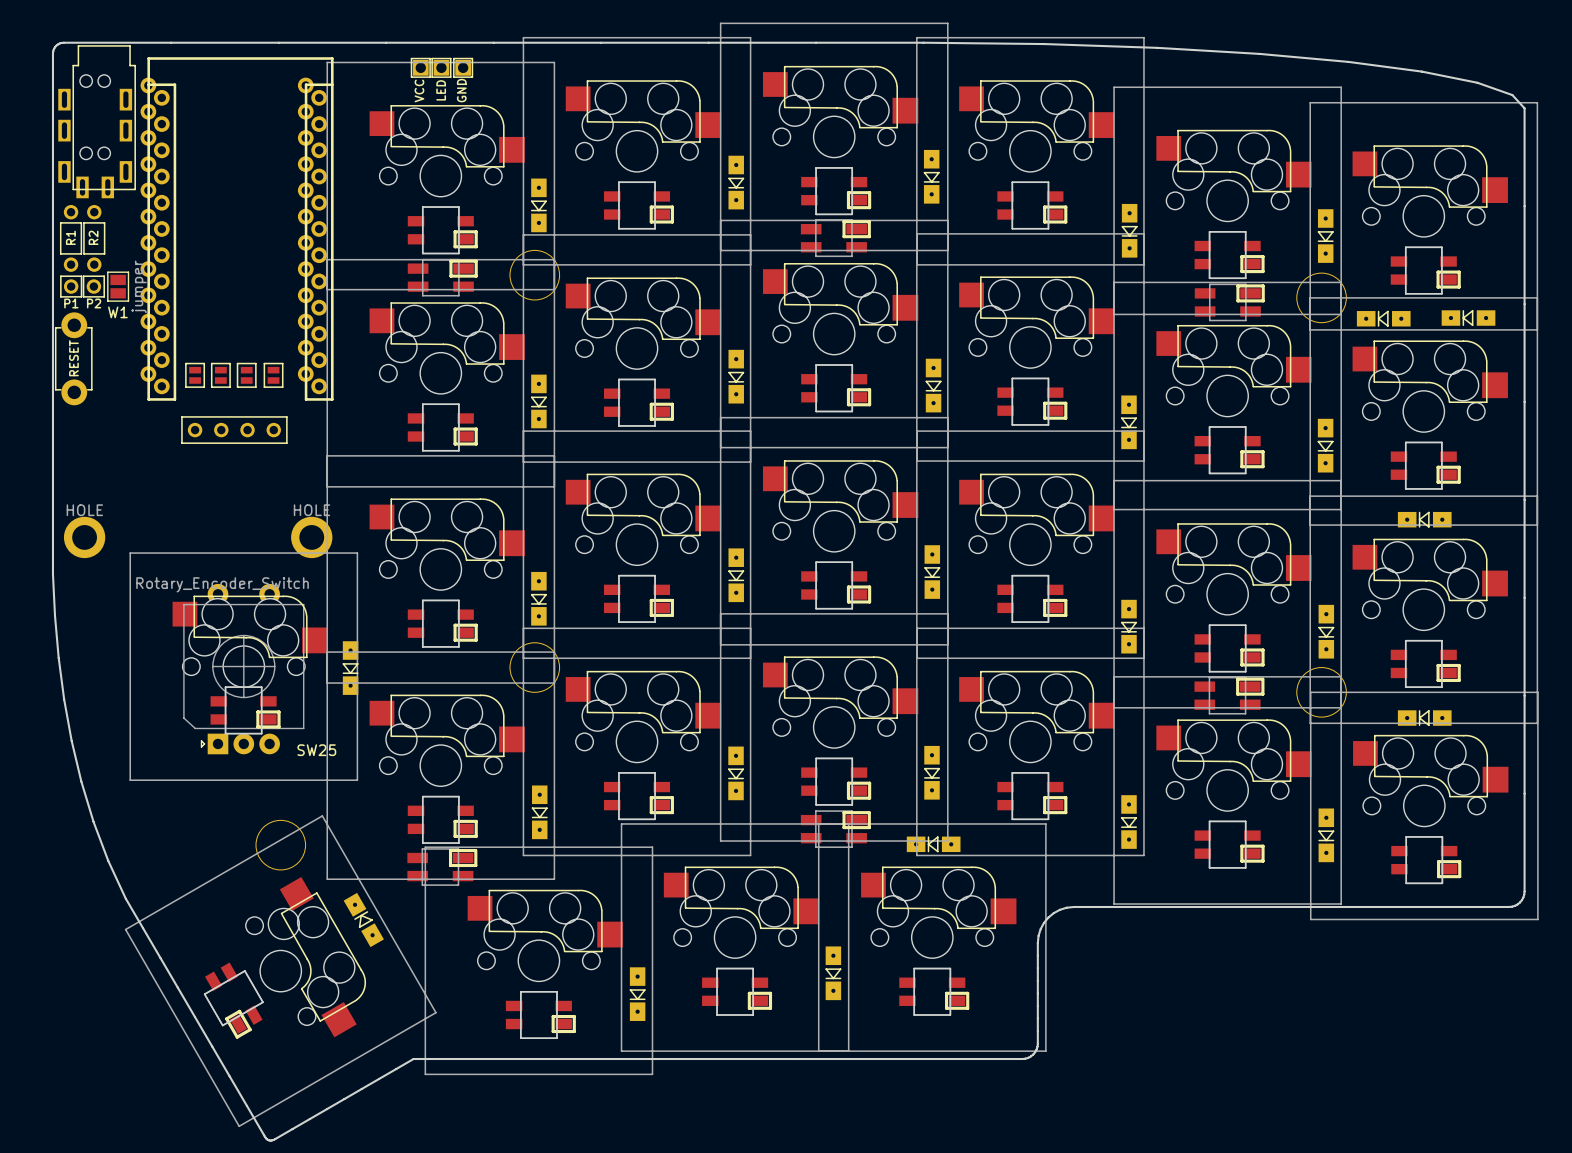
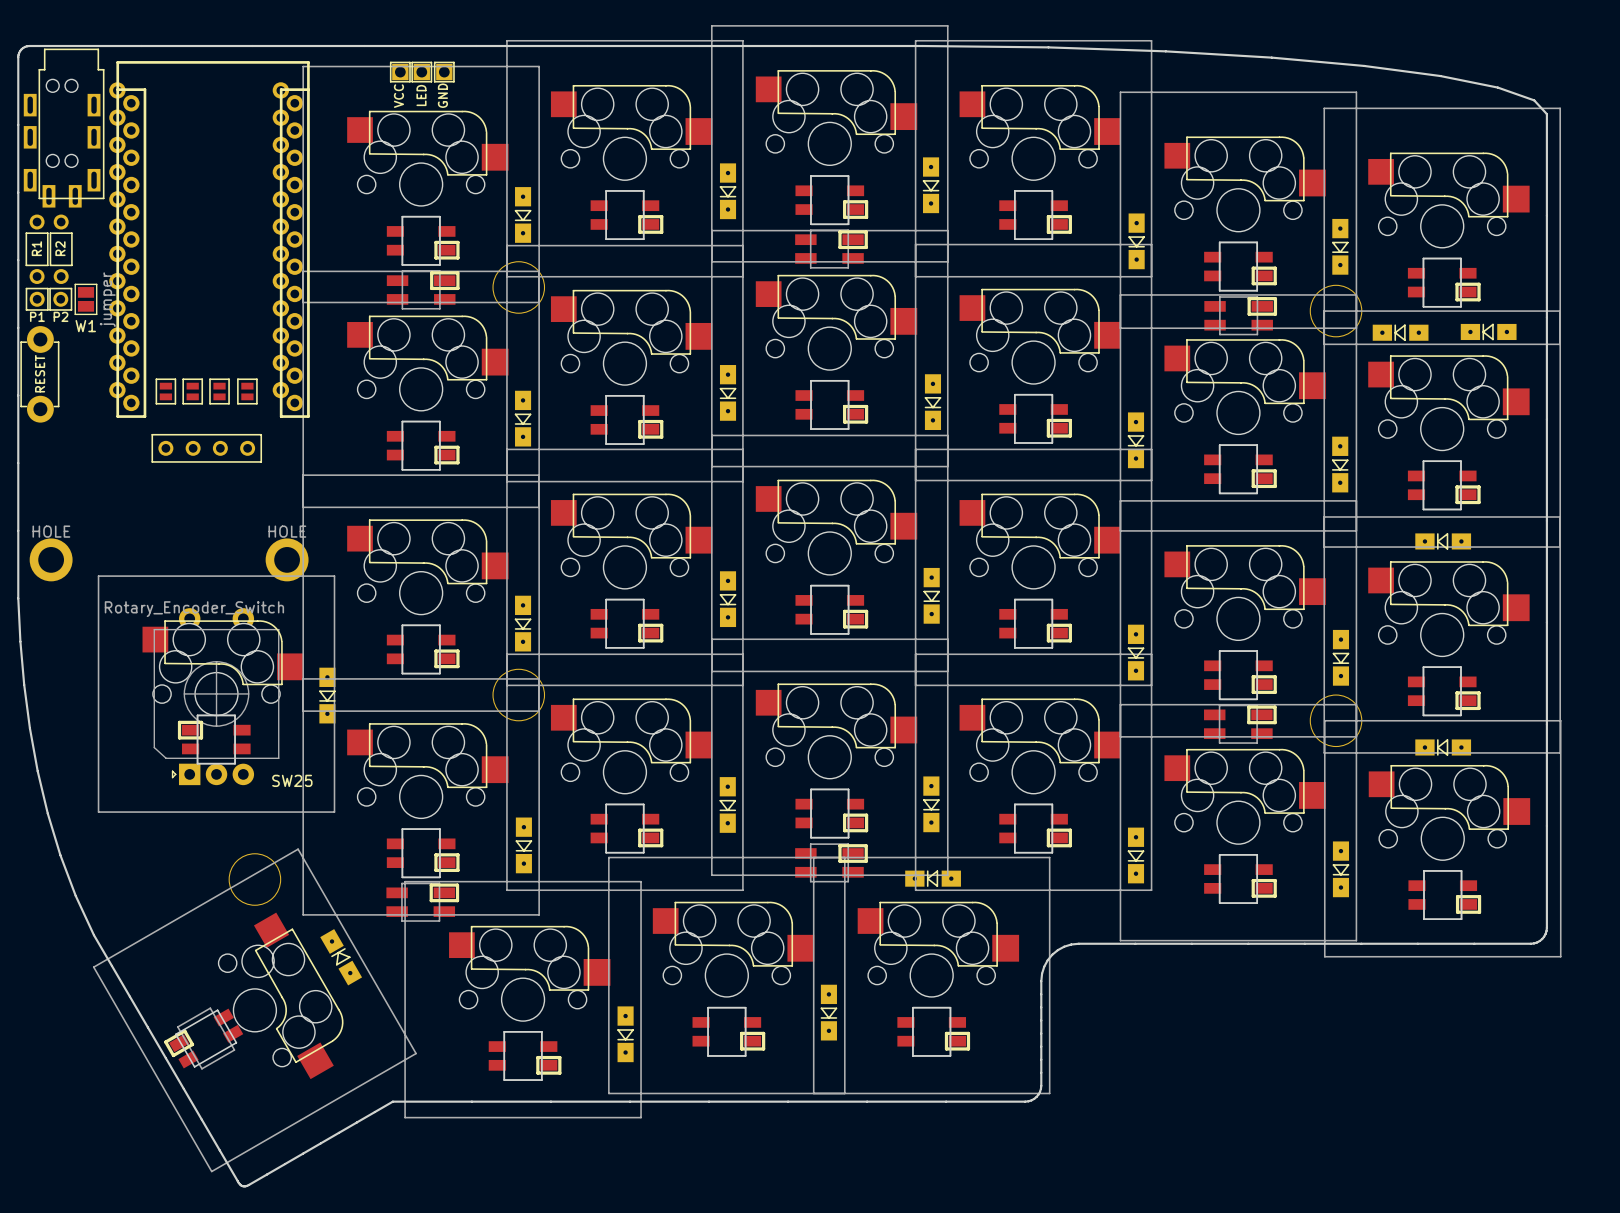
part rotation: 0° (245, 710) -> 180° (214, 739)
part rotation: 0° (233, 1000) -> 90° clockwise (203, 1038)

